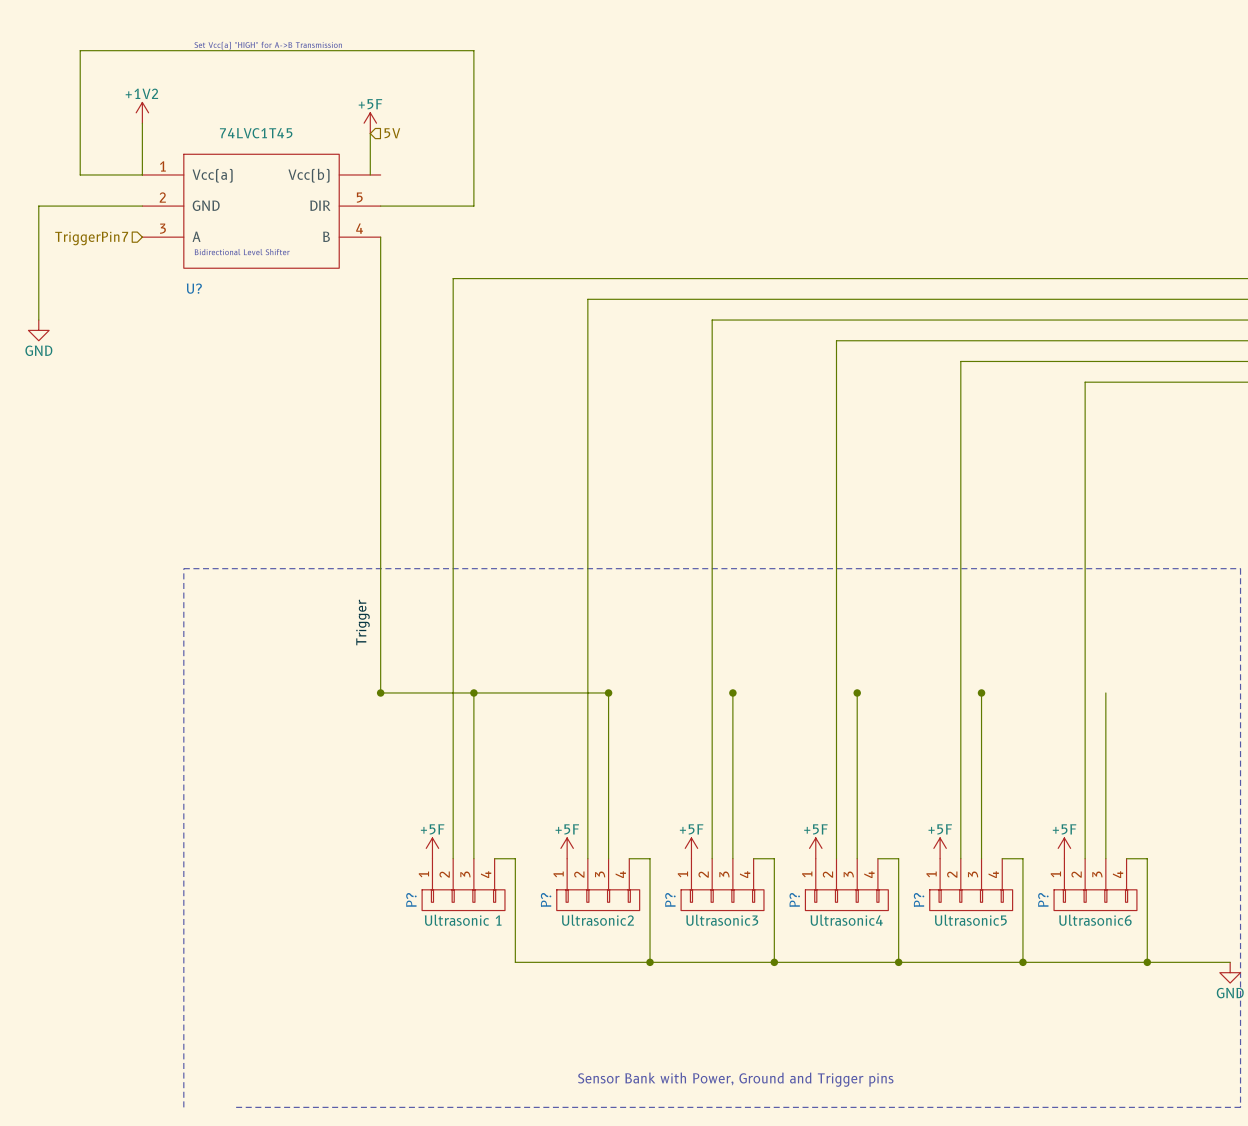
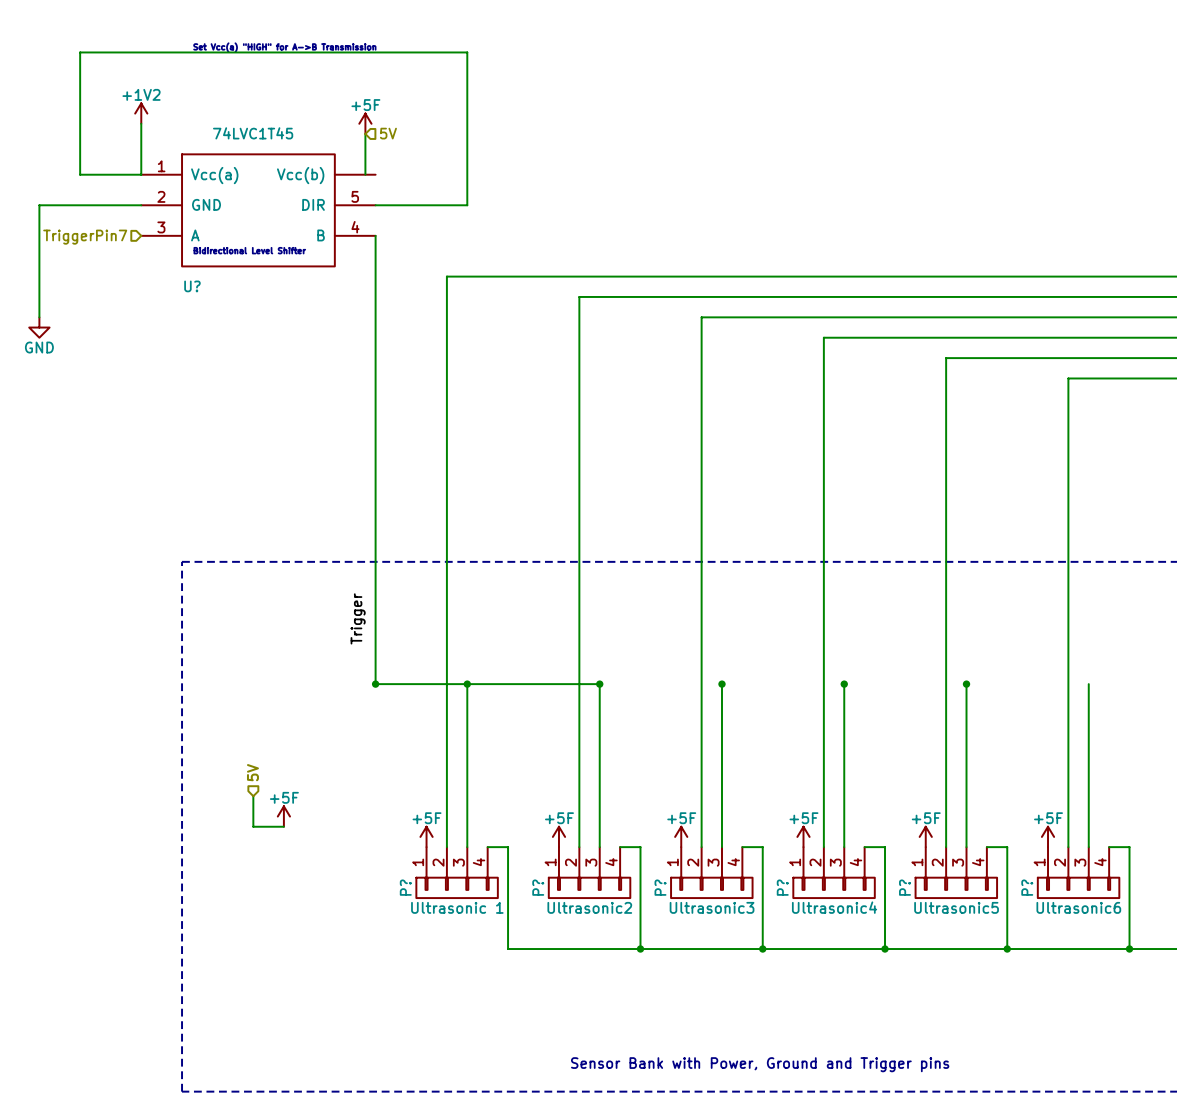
hierarchical label: none -> 5V (252, 772)
wire: none -> (253, 796) (253, 826) (283, 826)
power symbol: none -> +5F (283, 816)
line: none -> (182, 1091) (232, 1091)

